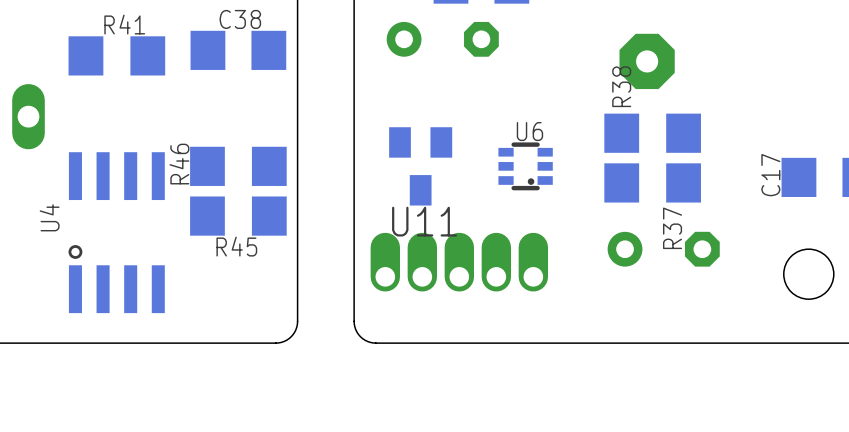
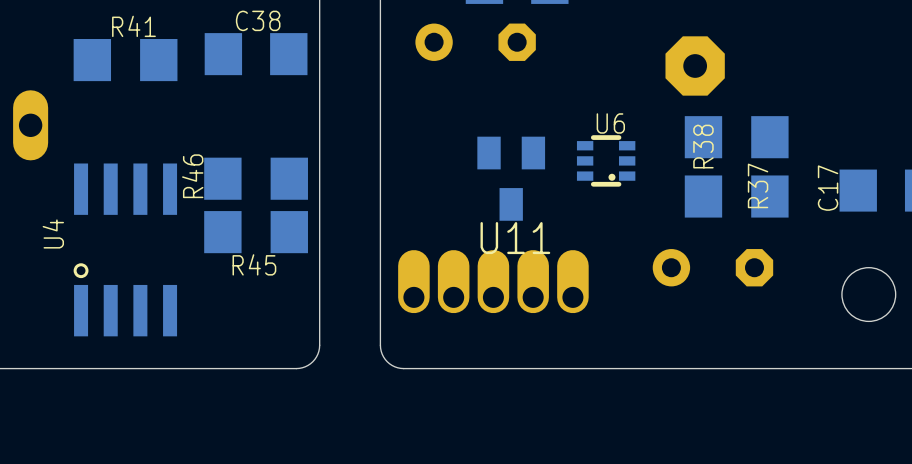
R38 position: (652, 133) -> (736, 196)
U11 position: (420, 166) -> (511, 178)
U6 position: (525, 166) -> (606, 160)
R37 position: (652, 182) -> (736, 137)

